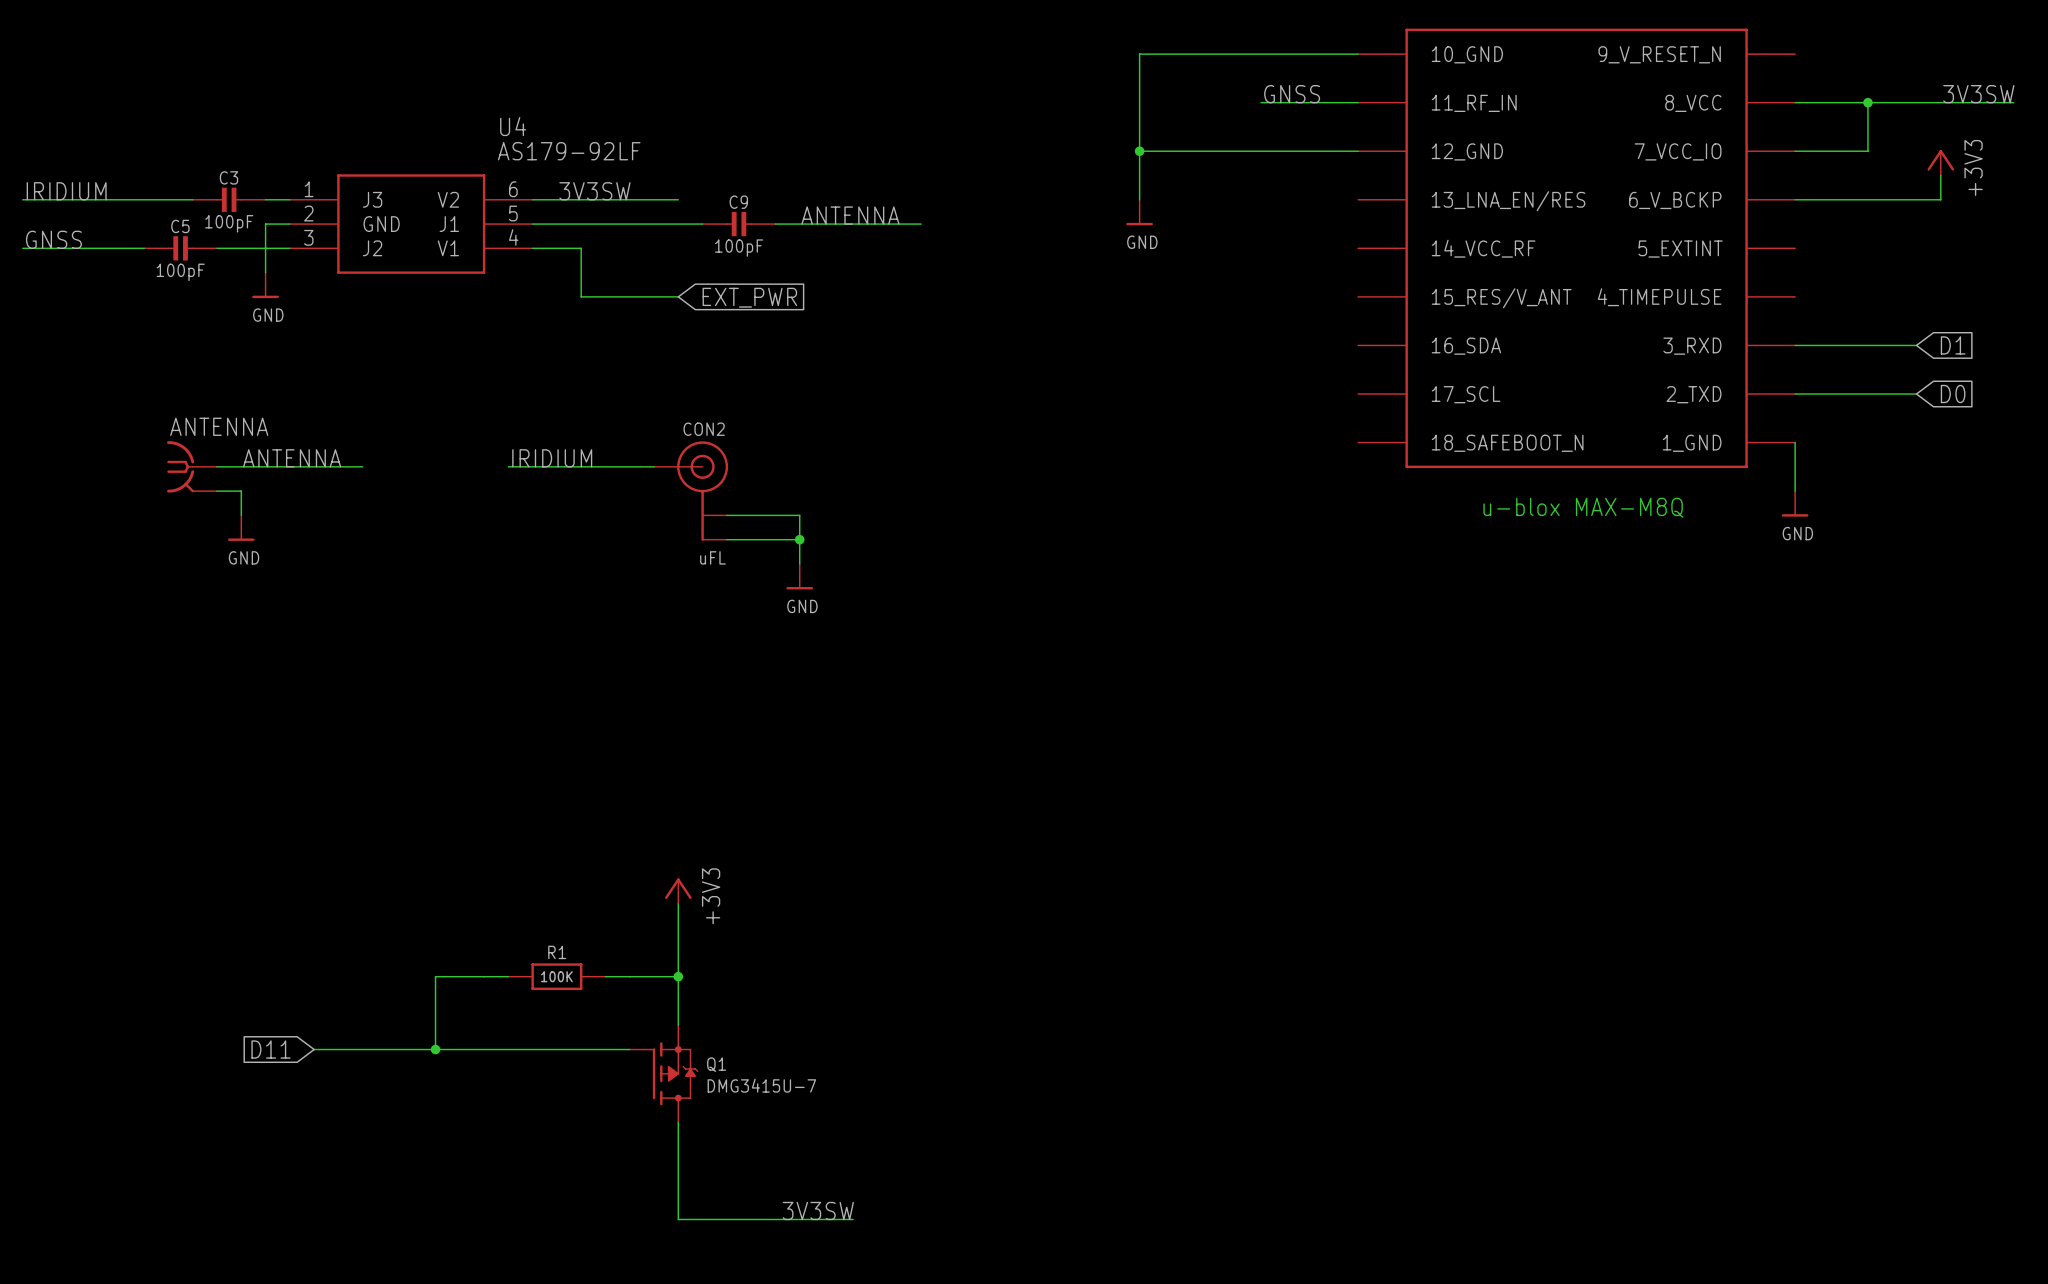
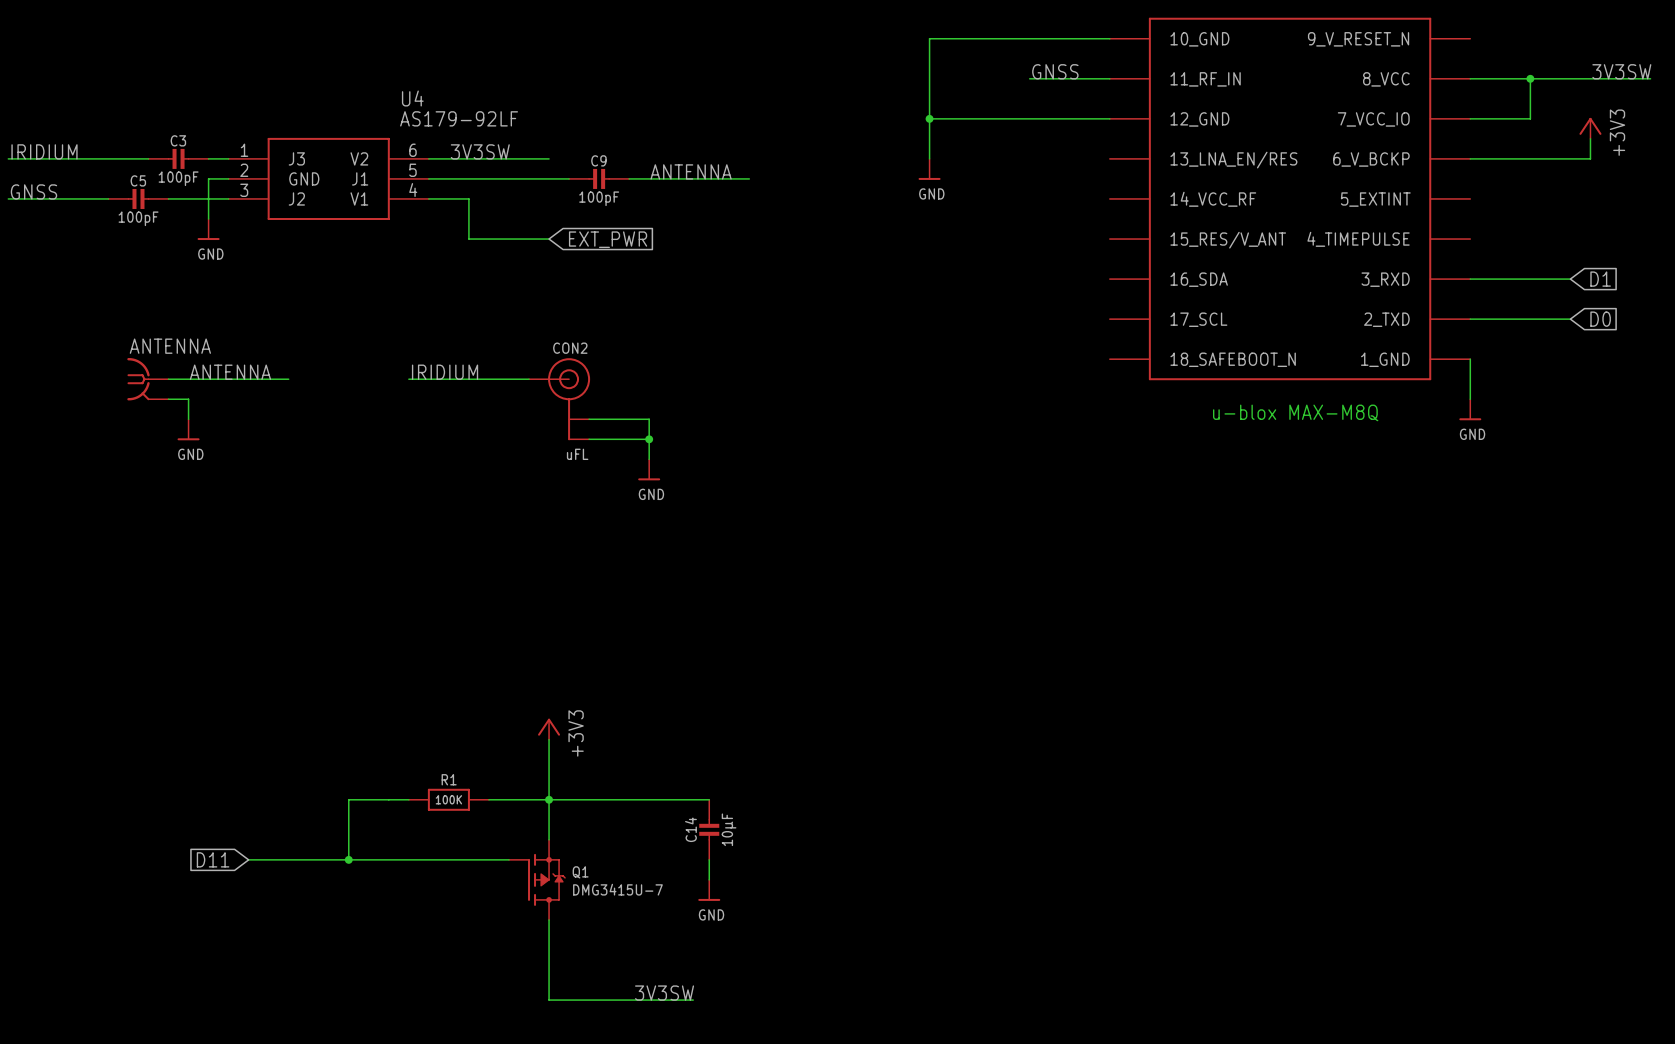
wire: none -> (549, 799) (709, 799)
C14: none -> 10µF (709, 829)
wire: none -> (709, 859) (709, 879)
power symbol: none -> GND (709, 890)

